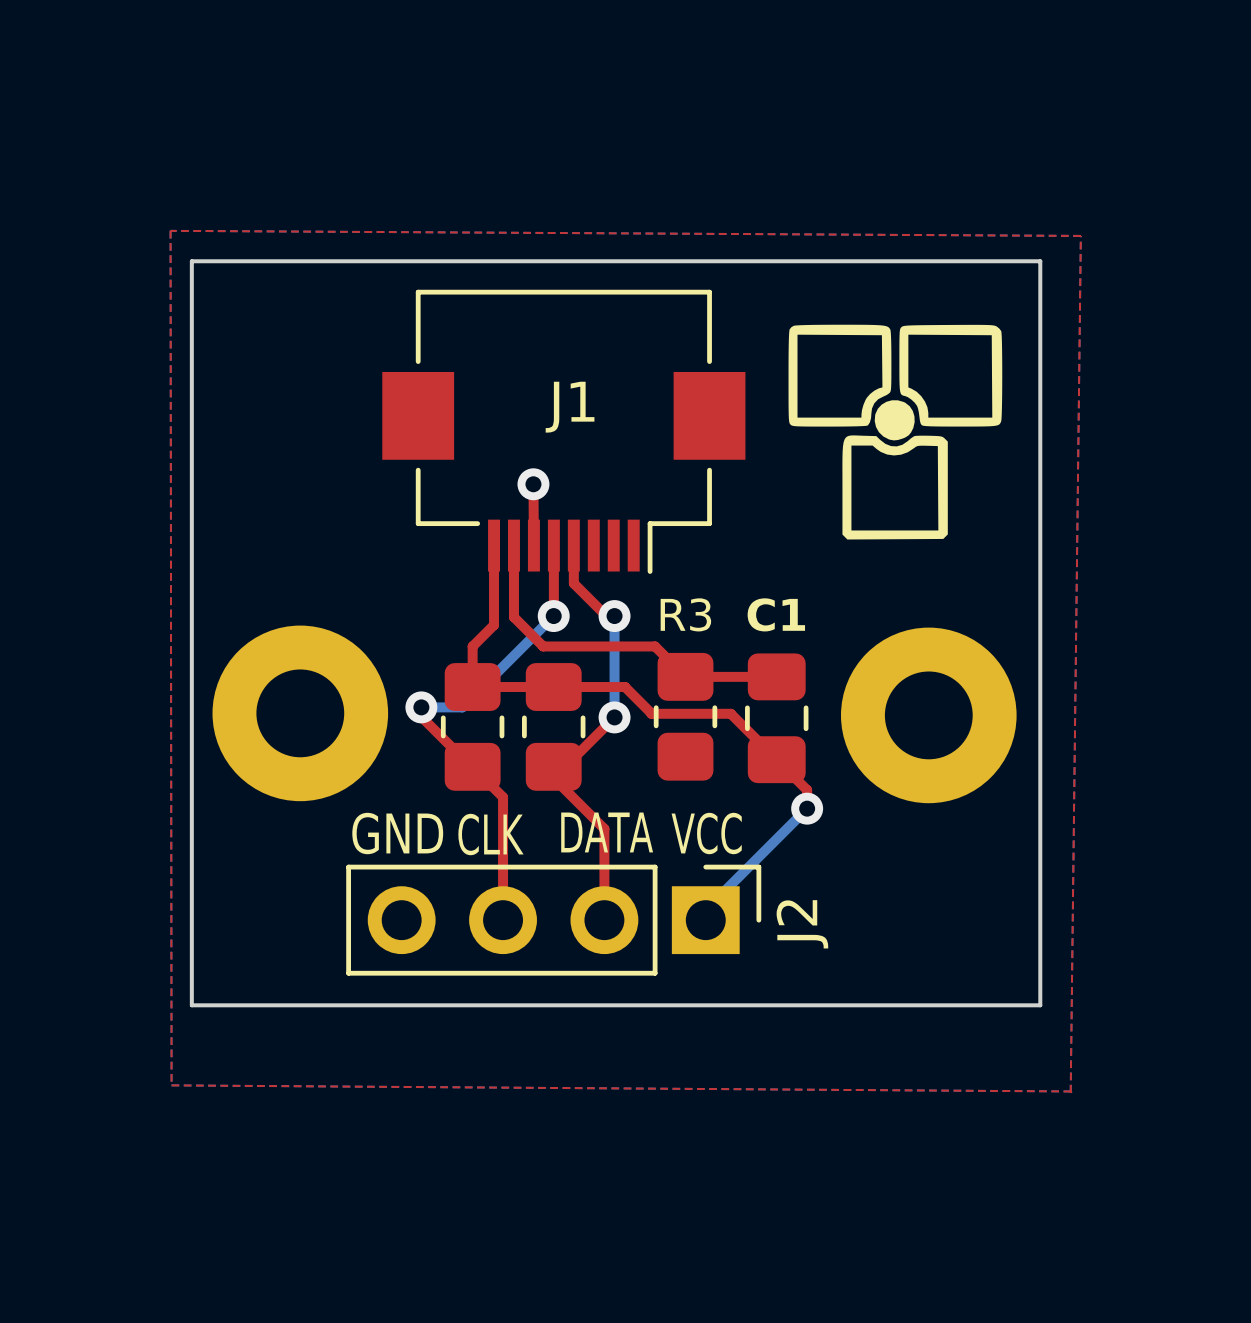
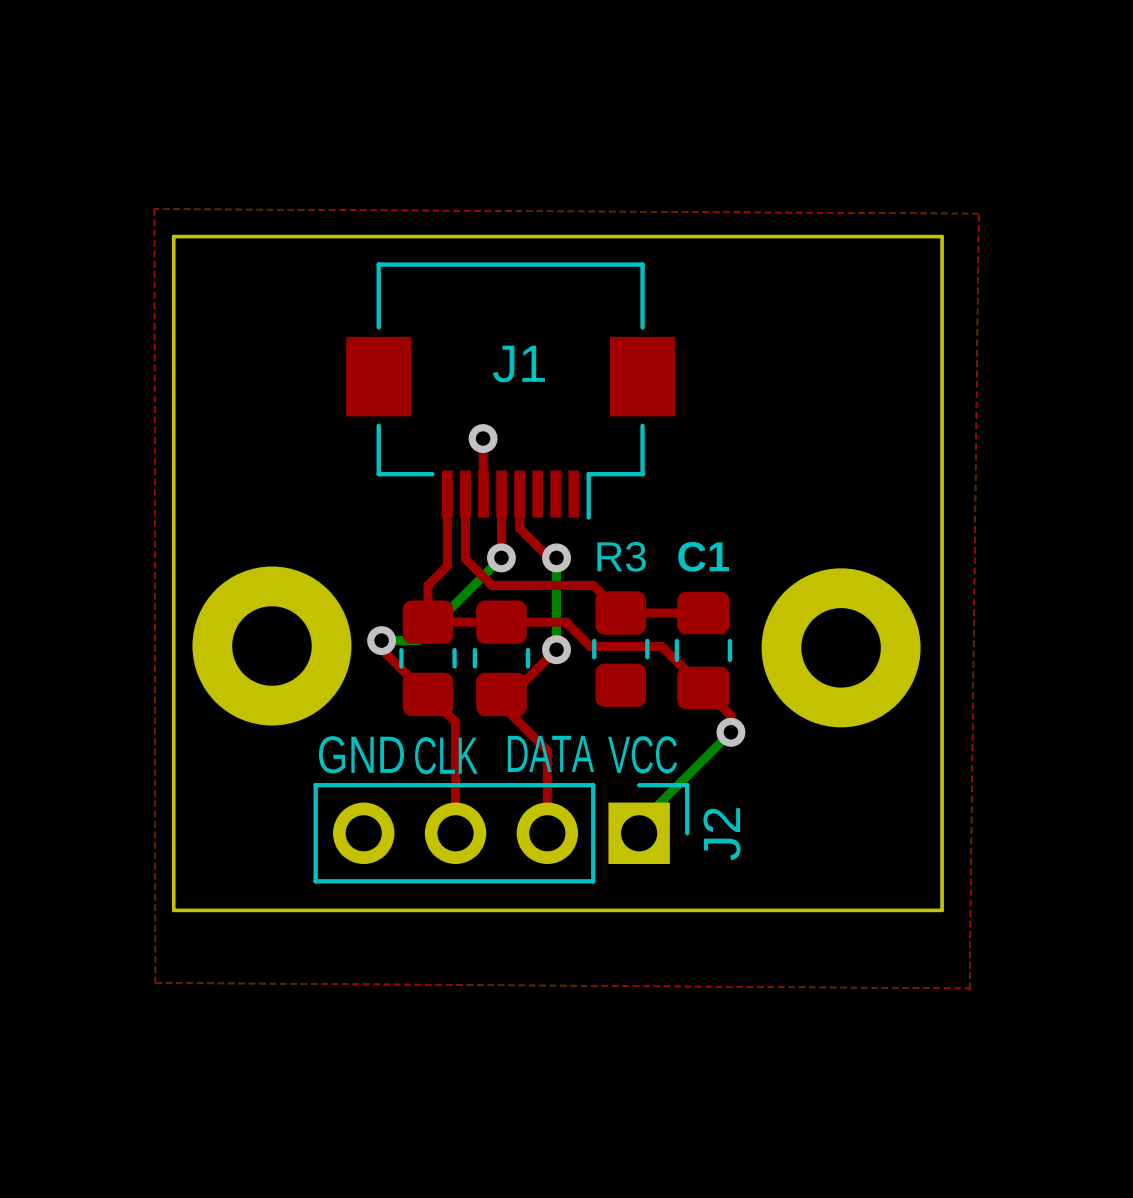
drawing: [788, 324, 1003, 540] -> none

